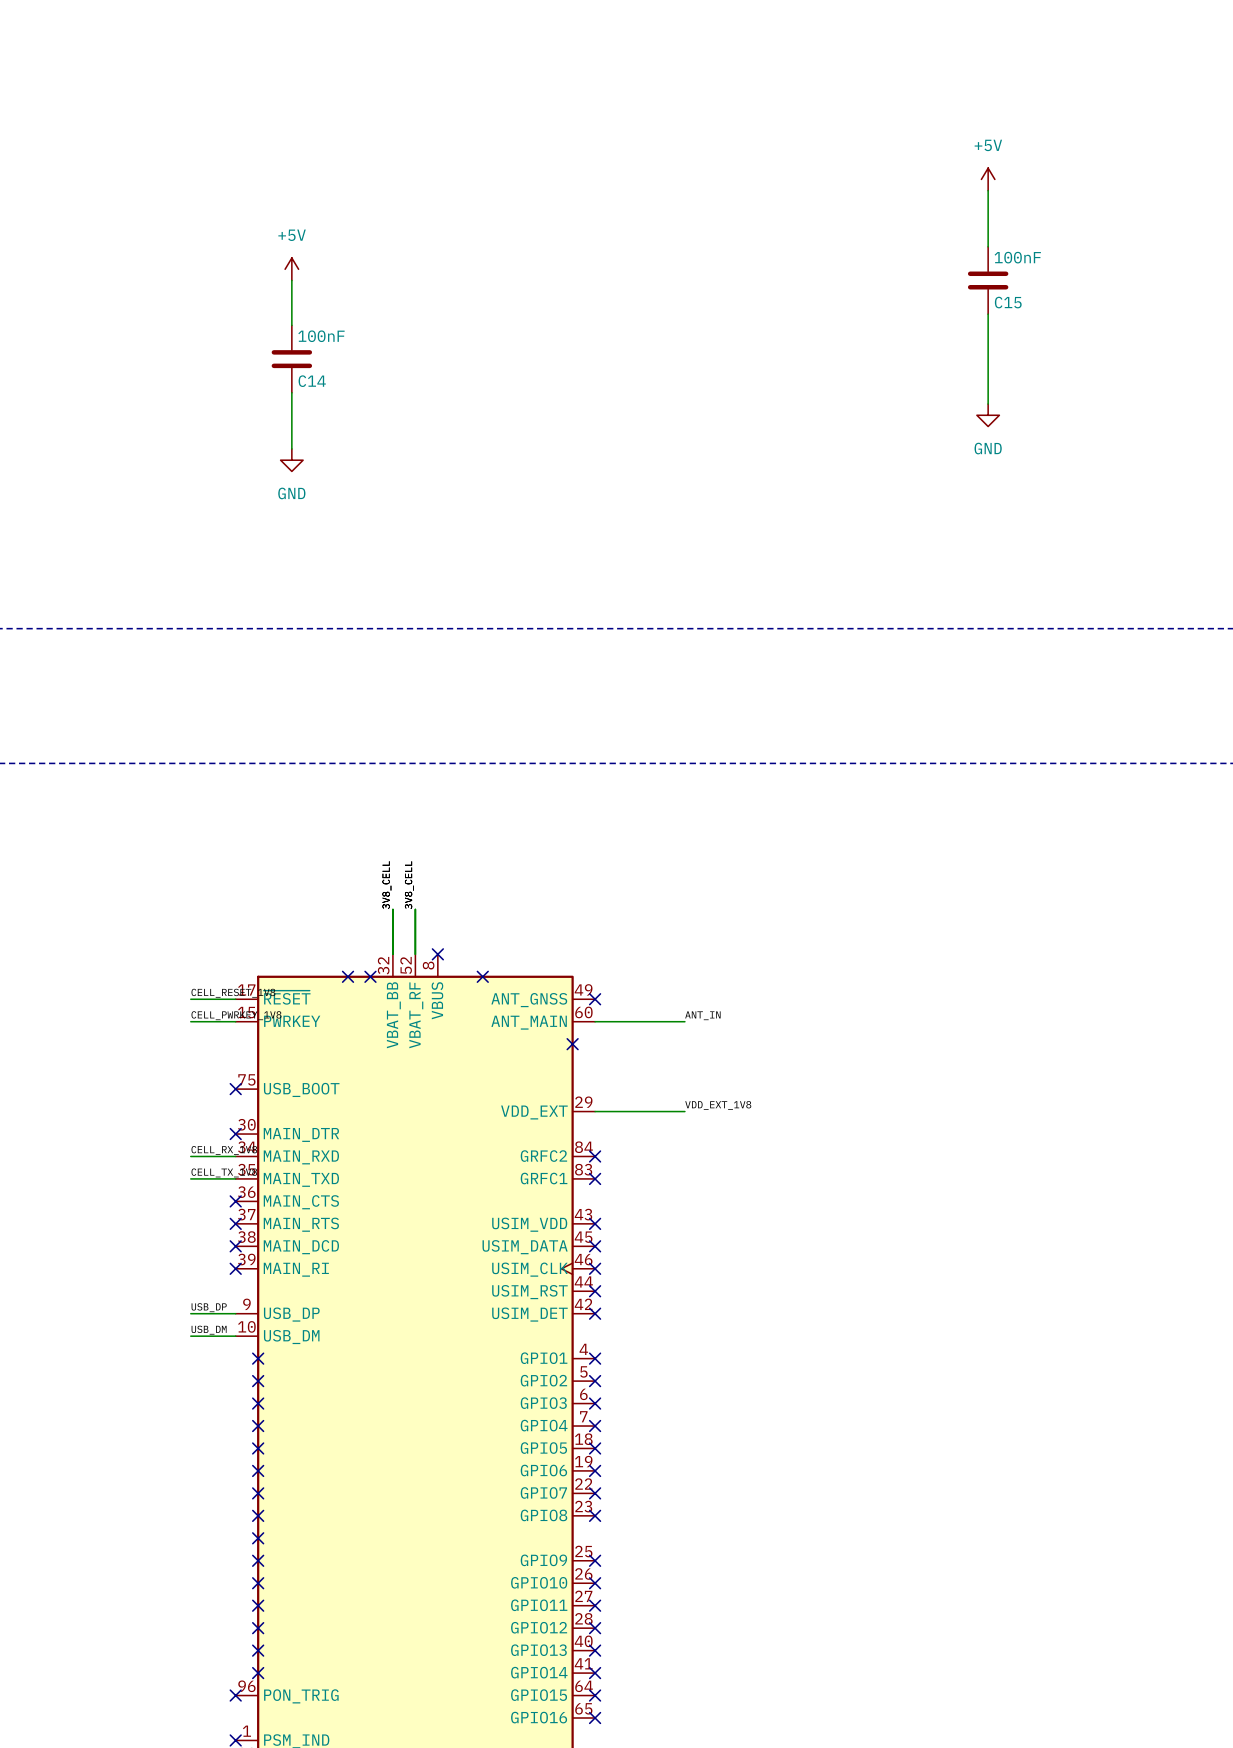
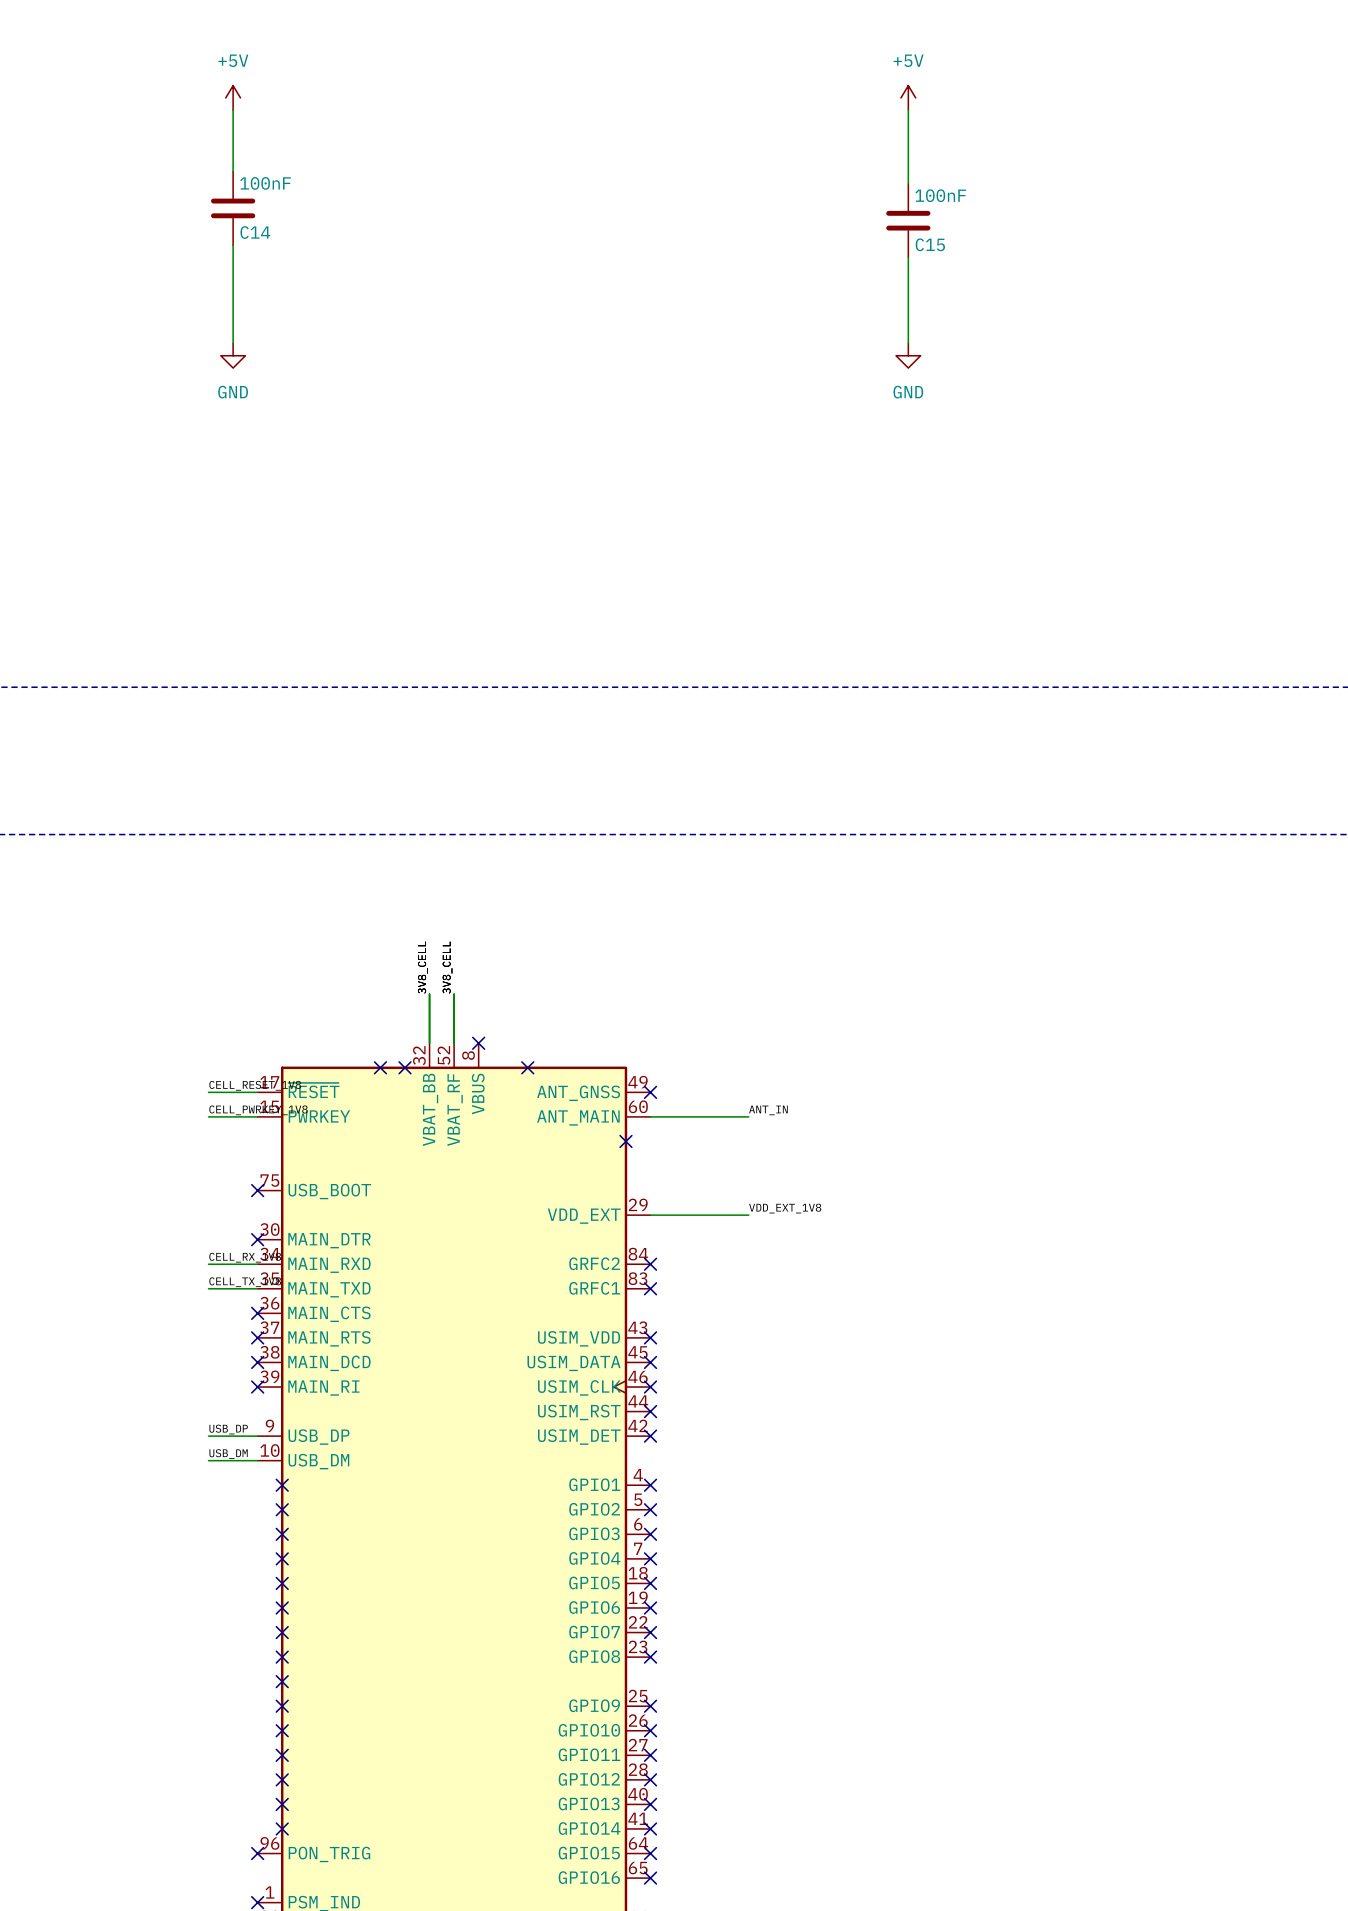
wire: none -> (233, 110) (233, 171)
wire: none -> (908, 110) (908, 183)
power symbol position: +5V (988, 179) -> +5V (908, 97)
wire: (988, 190) (988, 246) -> none
wire: none -> (233, 245) (233, 343)
wire: none -> (908, 257) (908, 343)
power symbol position: +5V (291, 269) -> +5V (233, 97)
wire: (291, 280) (291, 325) -> none
C15 position: (988, 280) -> (908, 220)
wire: (988, 314) (988, 404) -> none
C14 position: (291, 359) -> (233, 208)
wire: (291, 392) (291, 448) -> none
power symbol position: GND (988, 415) -> GND (908, 355)
power symbol position: GND (291, 460) -> GND (233, 355)

